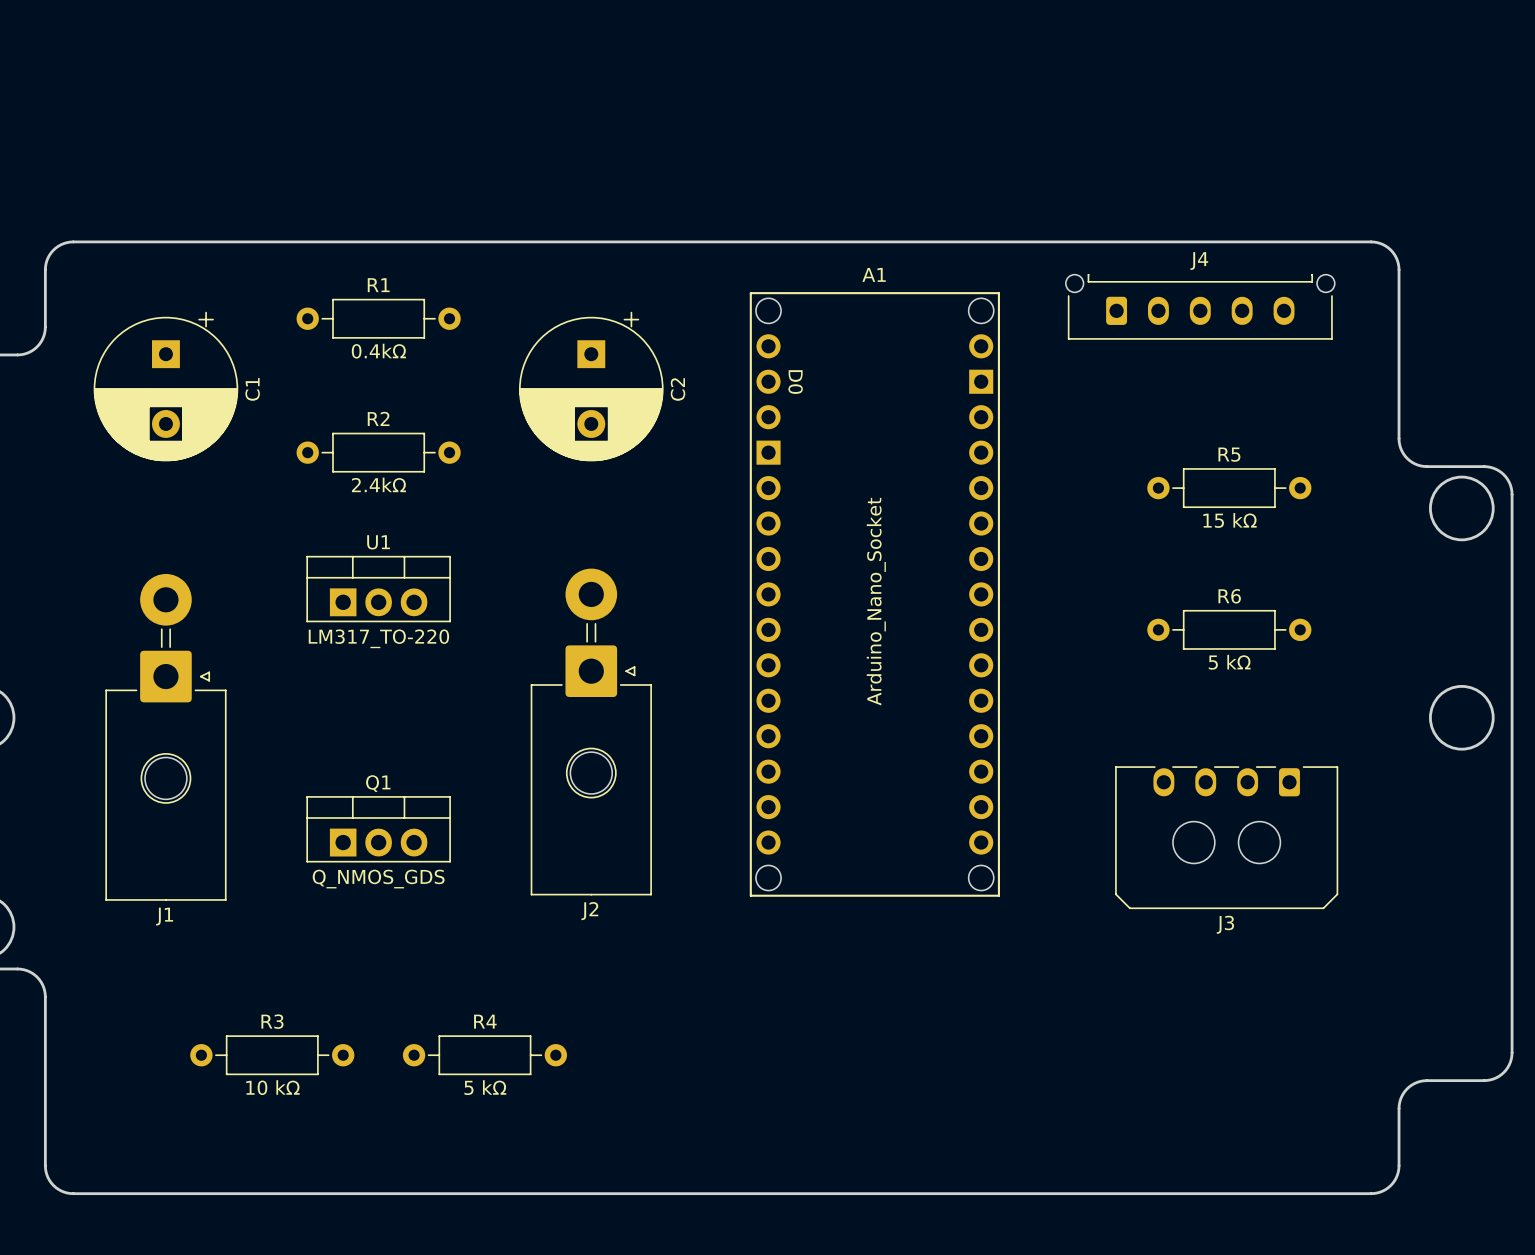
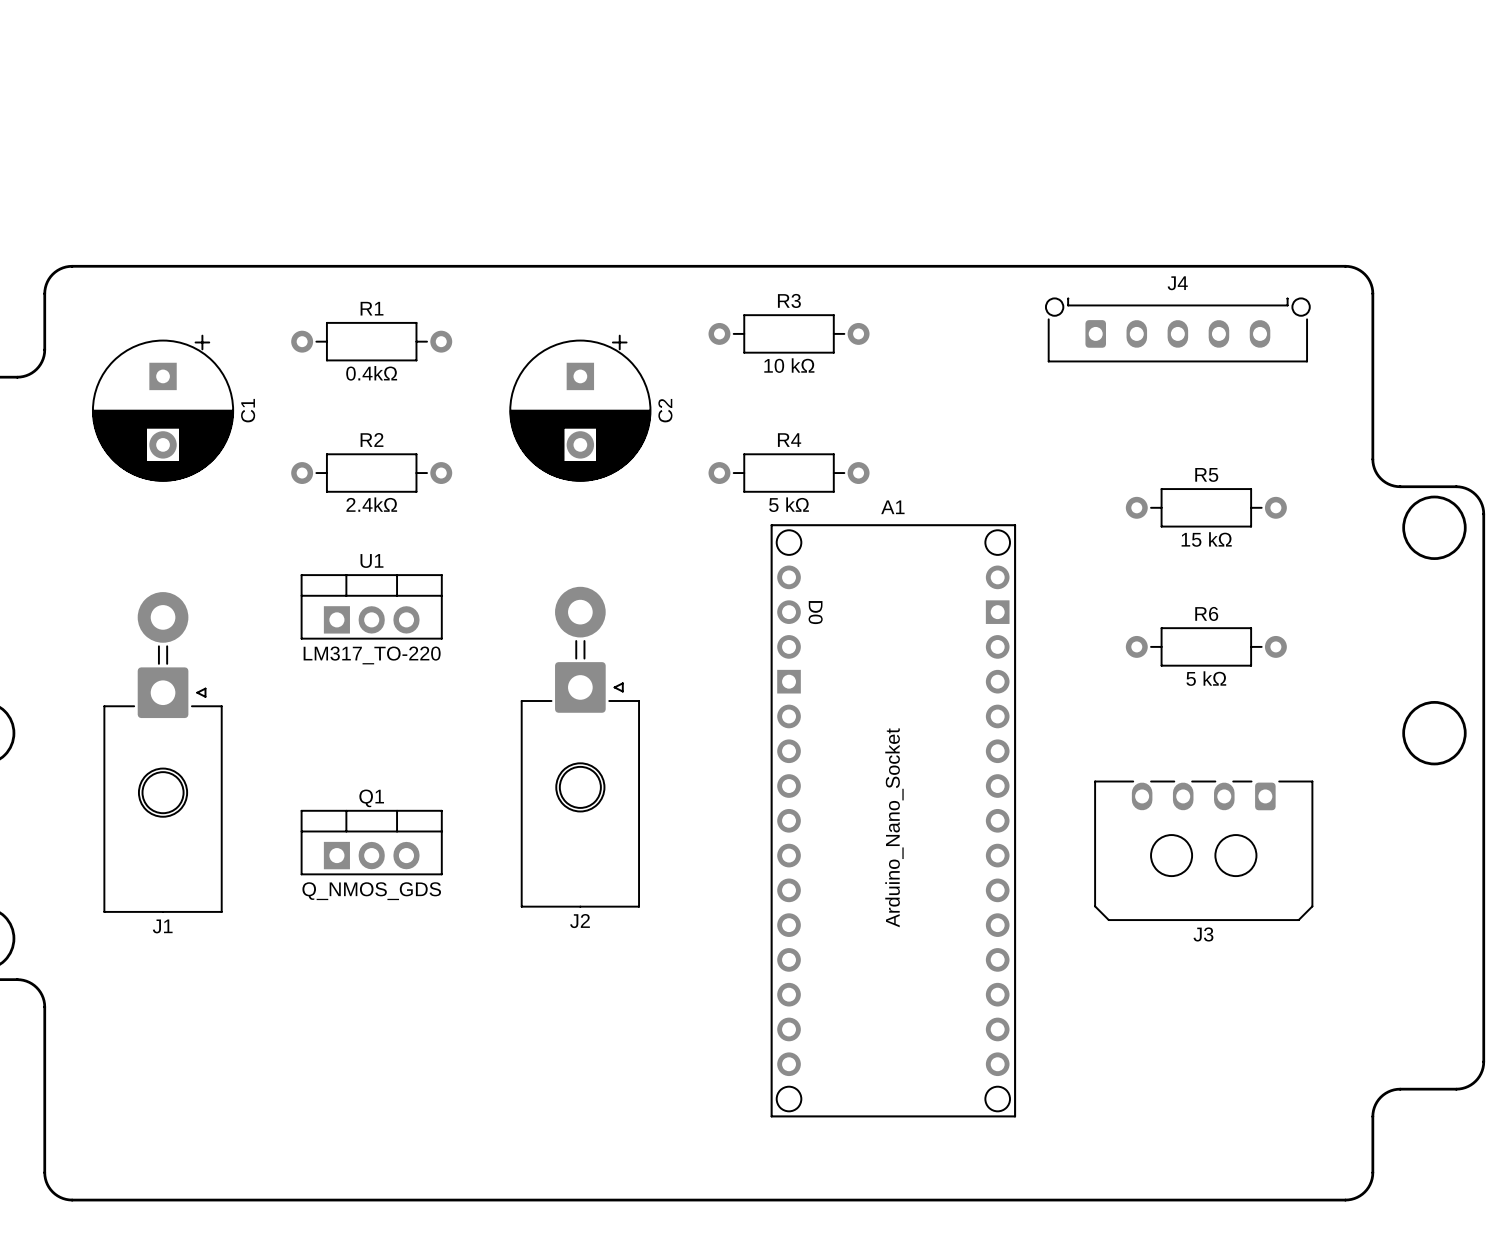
A1 position: (874, 594) -> (893, 820)
R3 position: (272, 1055) -> (789, 333)
R4 position: (484, 1055) -> (789, 473)

